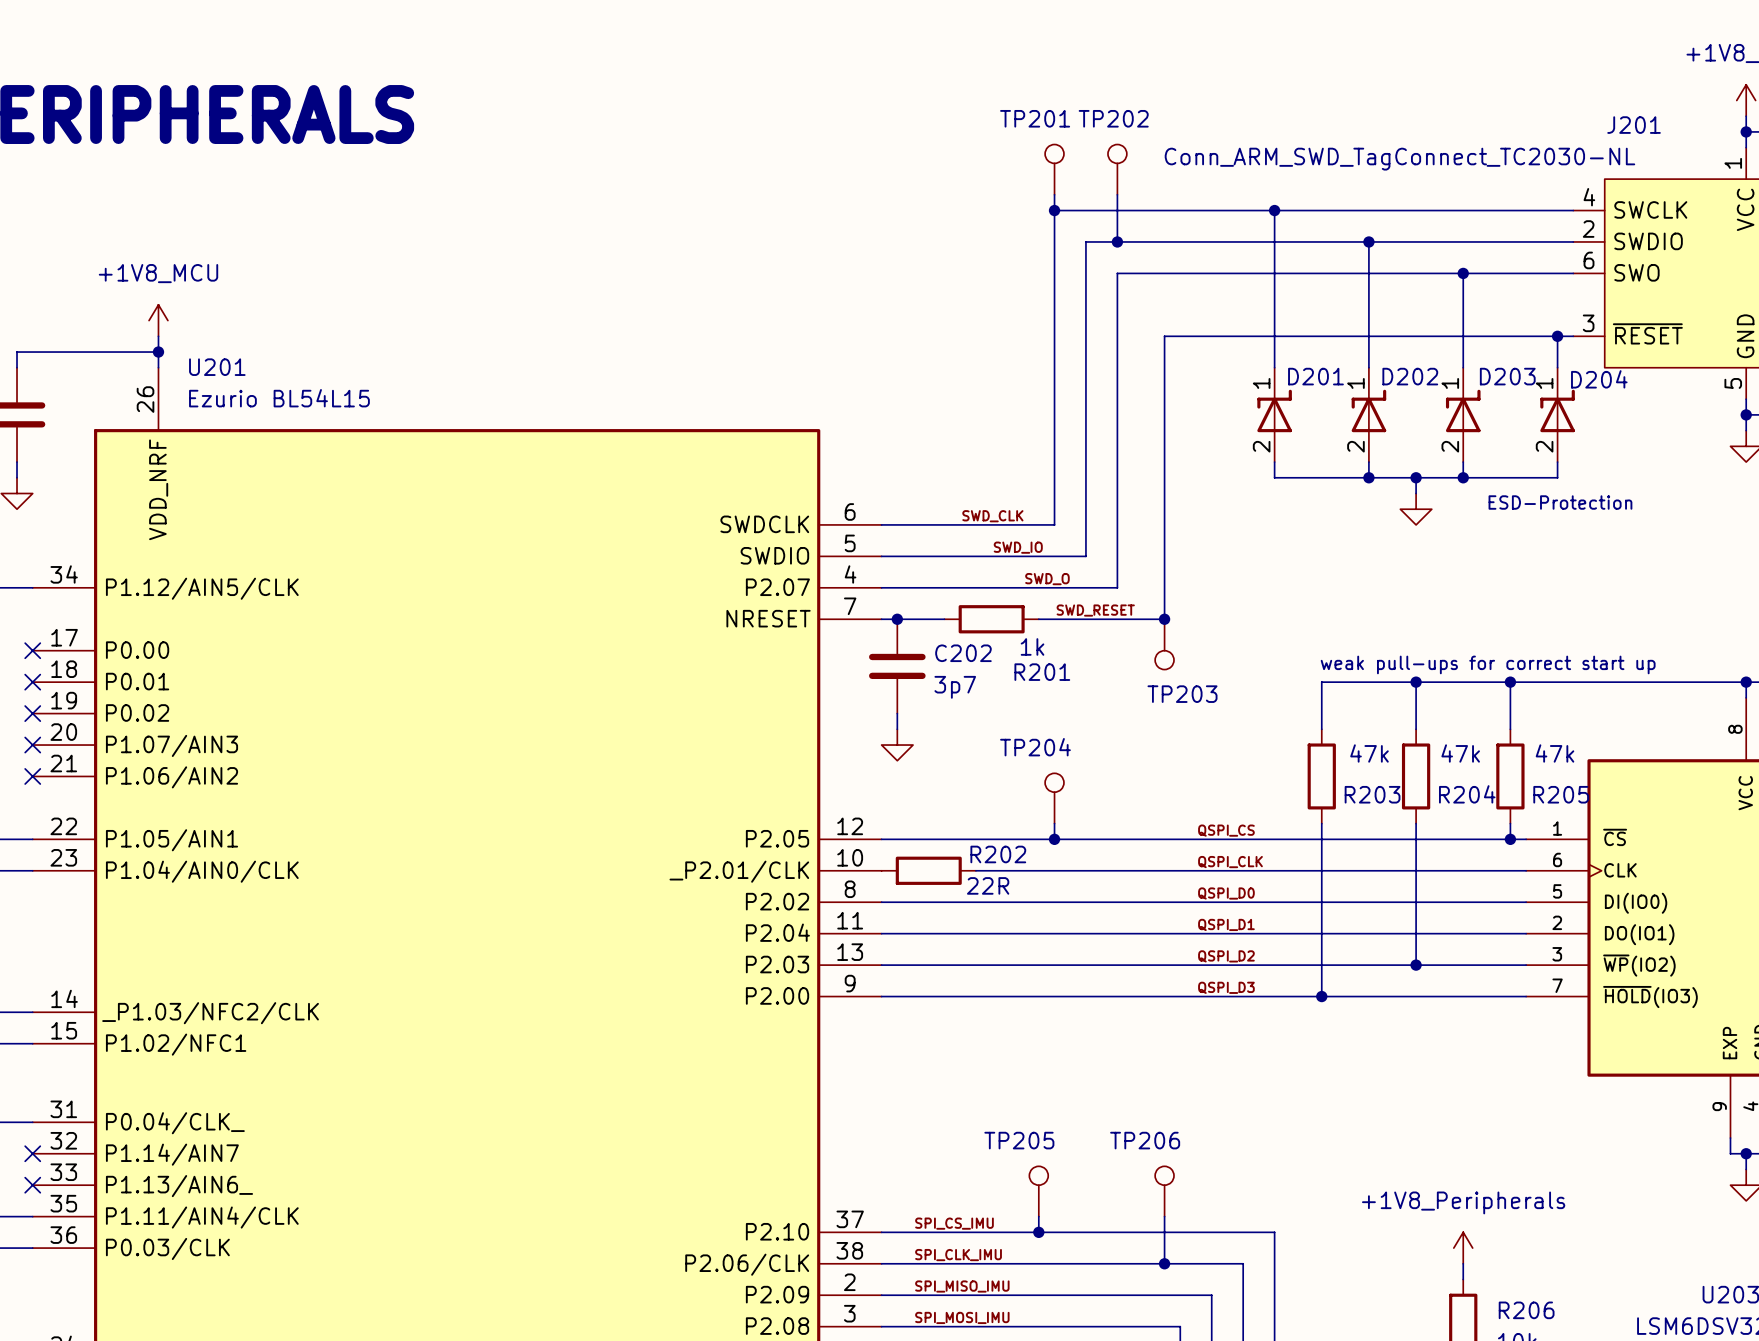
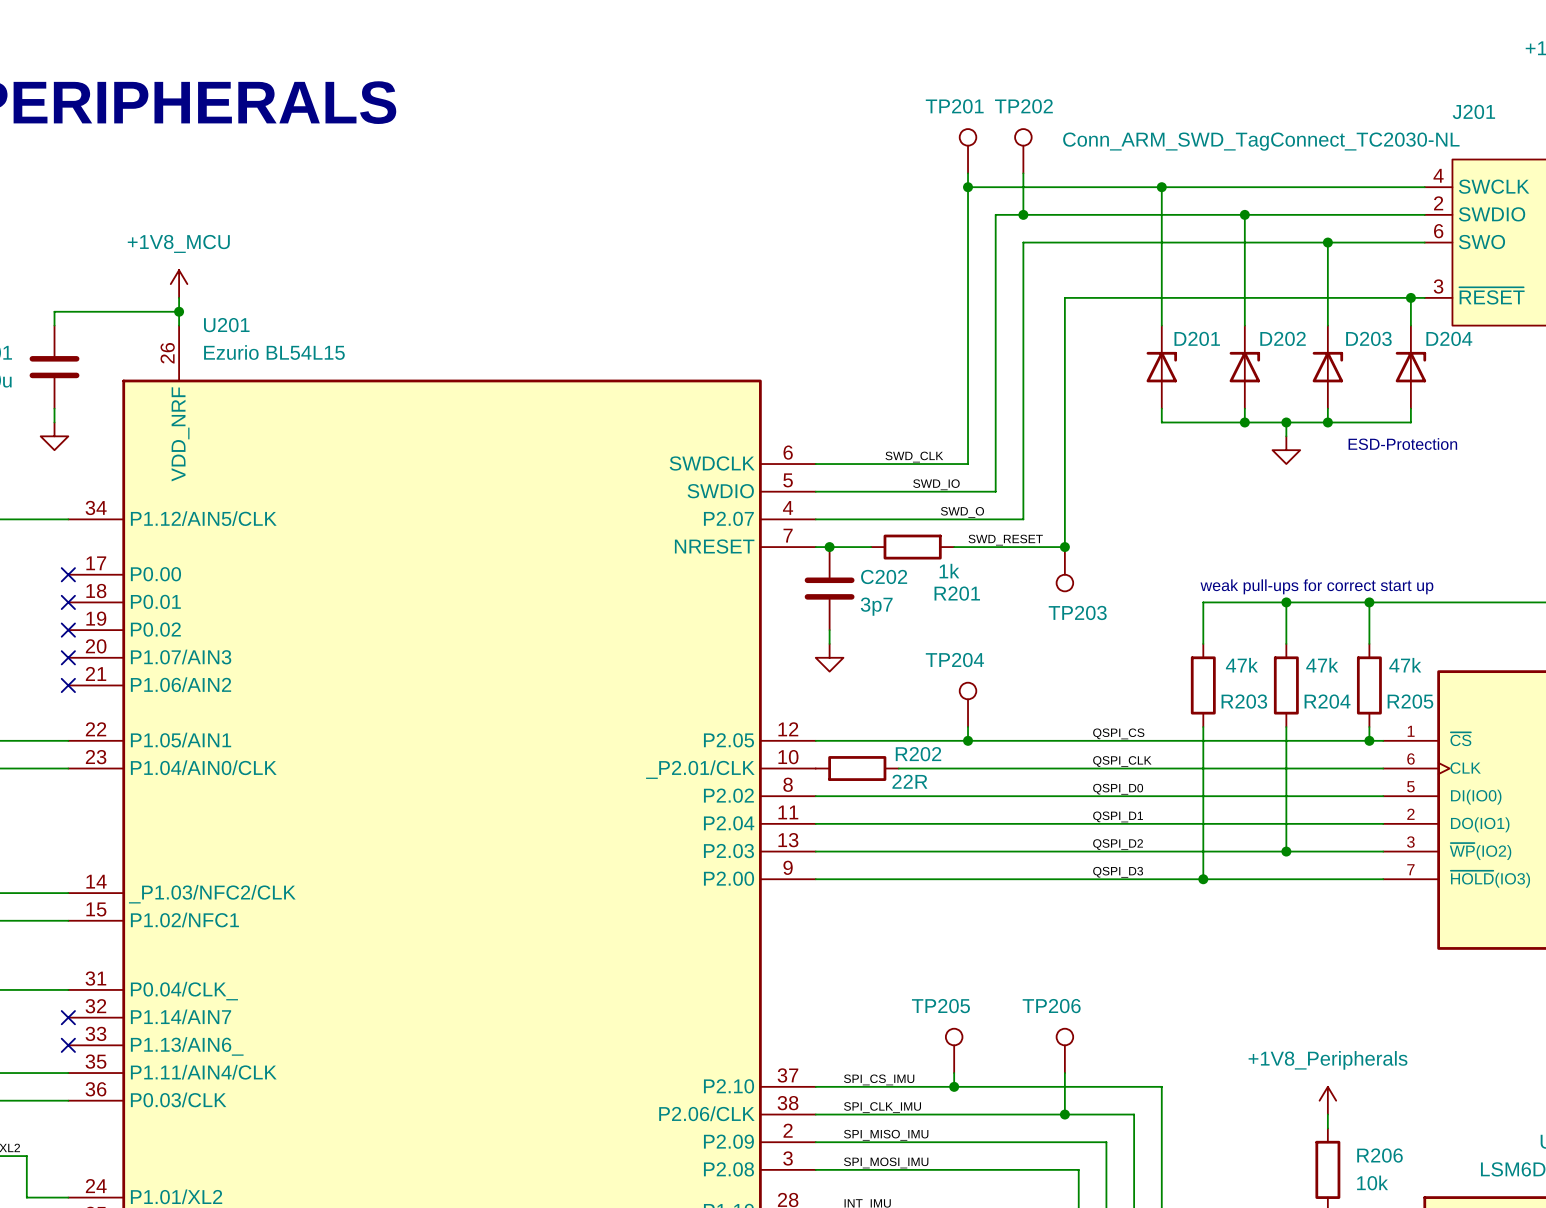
D201 symbol: [1257, 367, 1292, 463] -> [1146, 325, 1178, 409]
D202 symbol: [1351, 367, 1387, 463] -> [1229, 325, 1261, 409]
D203 symbol: [1445, 367, 1481, 463] -> [1312, 325, 1344, 409]
D204 symbol: [1540, 367, 1575, 463] -> [1395, 325, 1427, 409]

